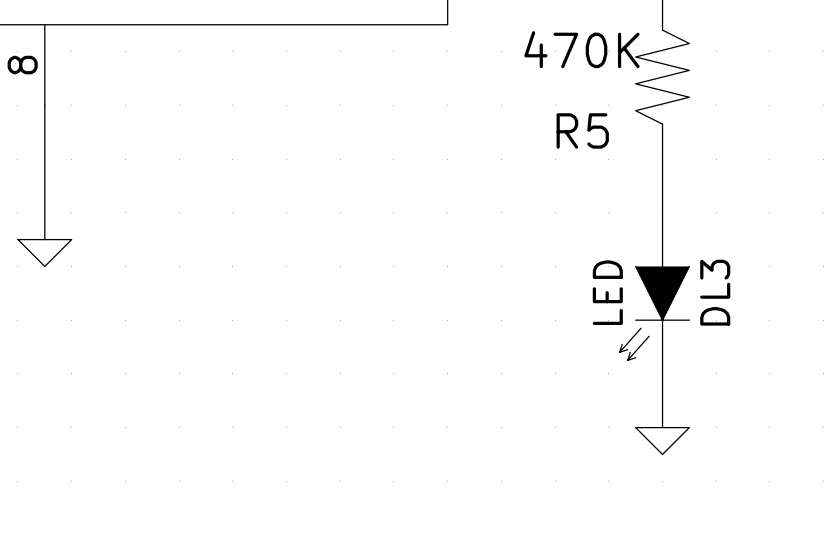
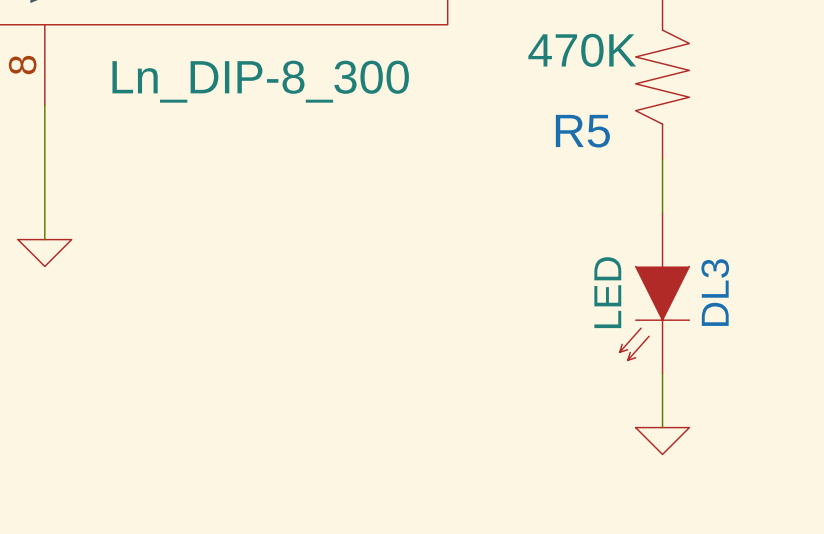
part text: none -> Ln_DIP-8_300 (260, 81)

